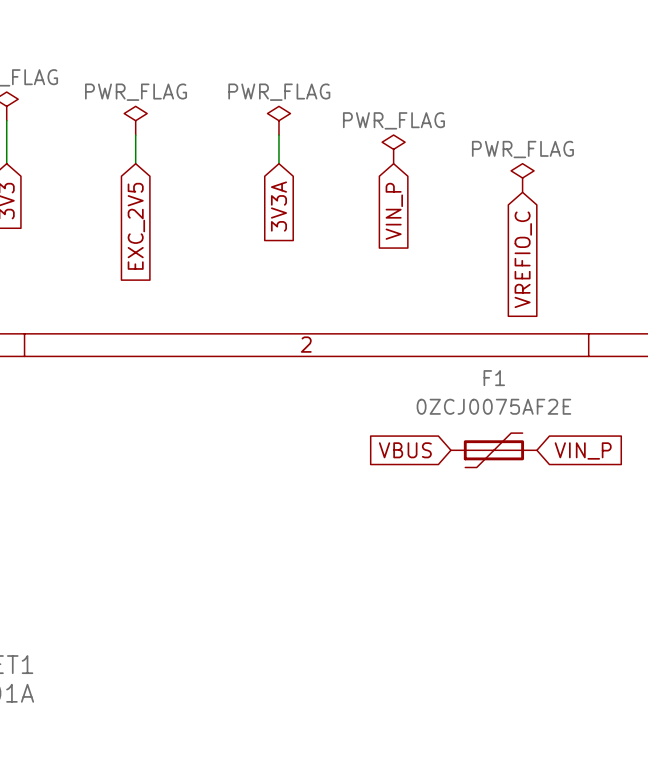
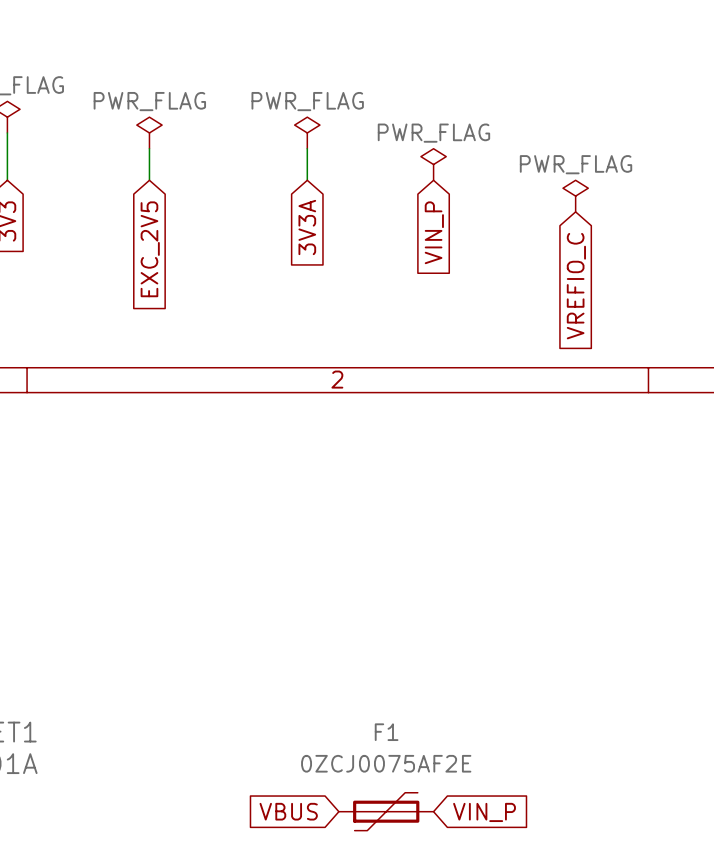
global label: VBUS (405, 450) -> none
F1 position: (493, 450) -> (386, 811)
global label: VIN_P (583, 450) -> none
global label: none -> VBUS (288, 811)
global label: none -> VIN_P (484, 812)

